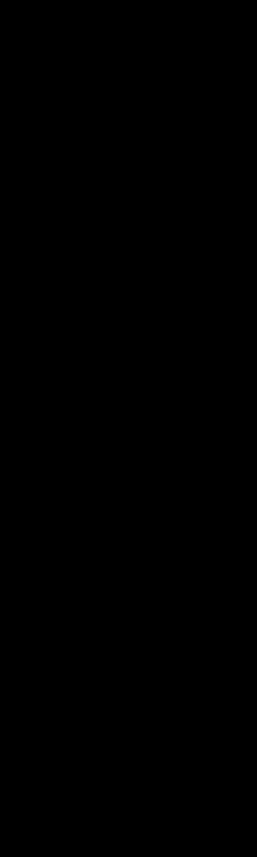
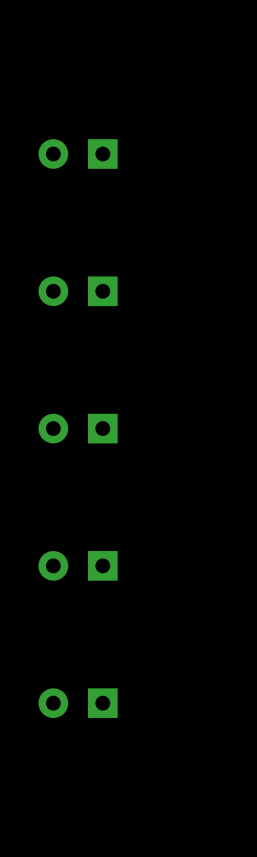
part: none -> (78, 153)
part: none -> (78, 291)
part: none -> (78, 428)
part: none -> (78, 565)
part: none -> (78, 703)

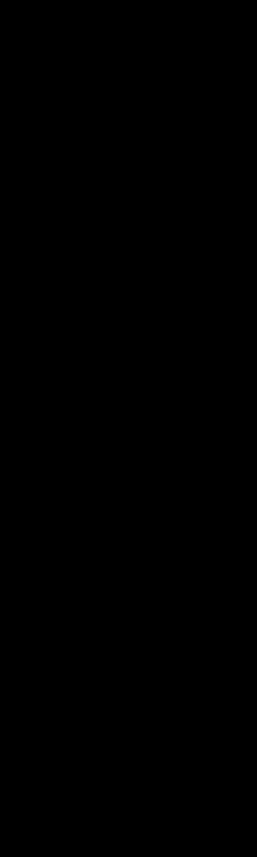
part: (78, 153) -> none
part: (78, 291) -> none
part: (78, 428) -> none
part: (78, 565) -> none
part: (78, 703) -> none

